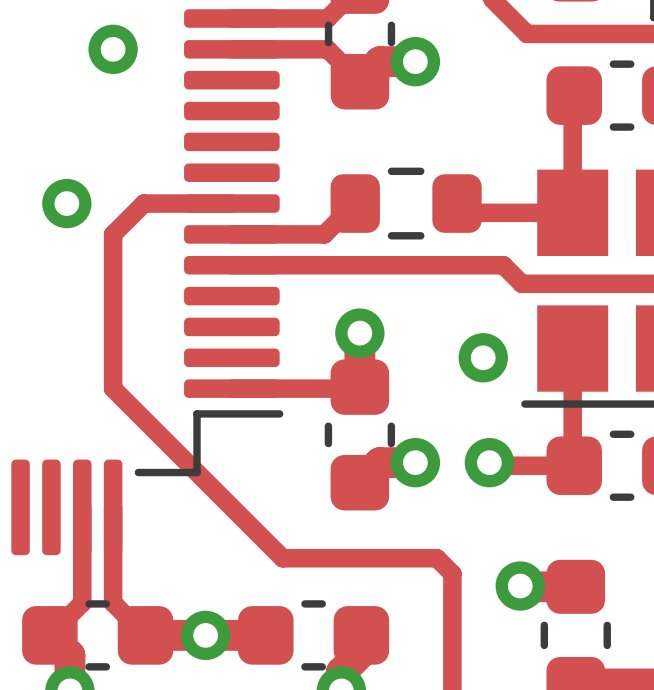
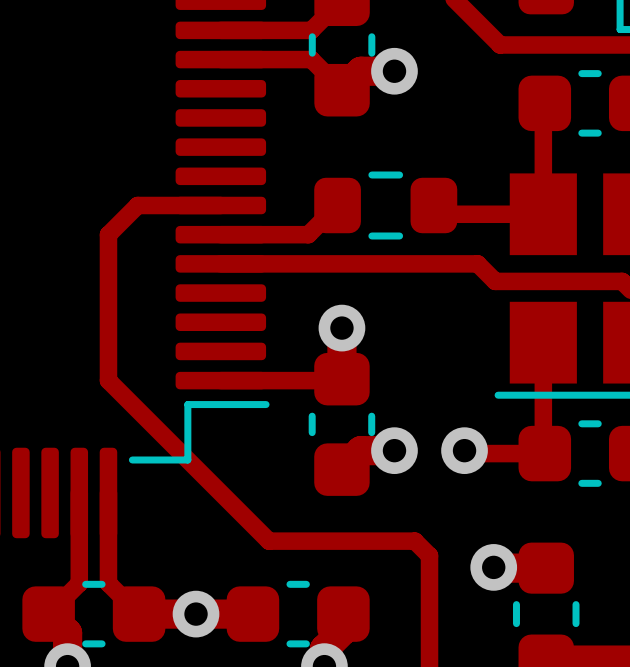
via: (113, 49) -> none
via: (66, 203) -> none
via: (483, 357) -> none

